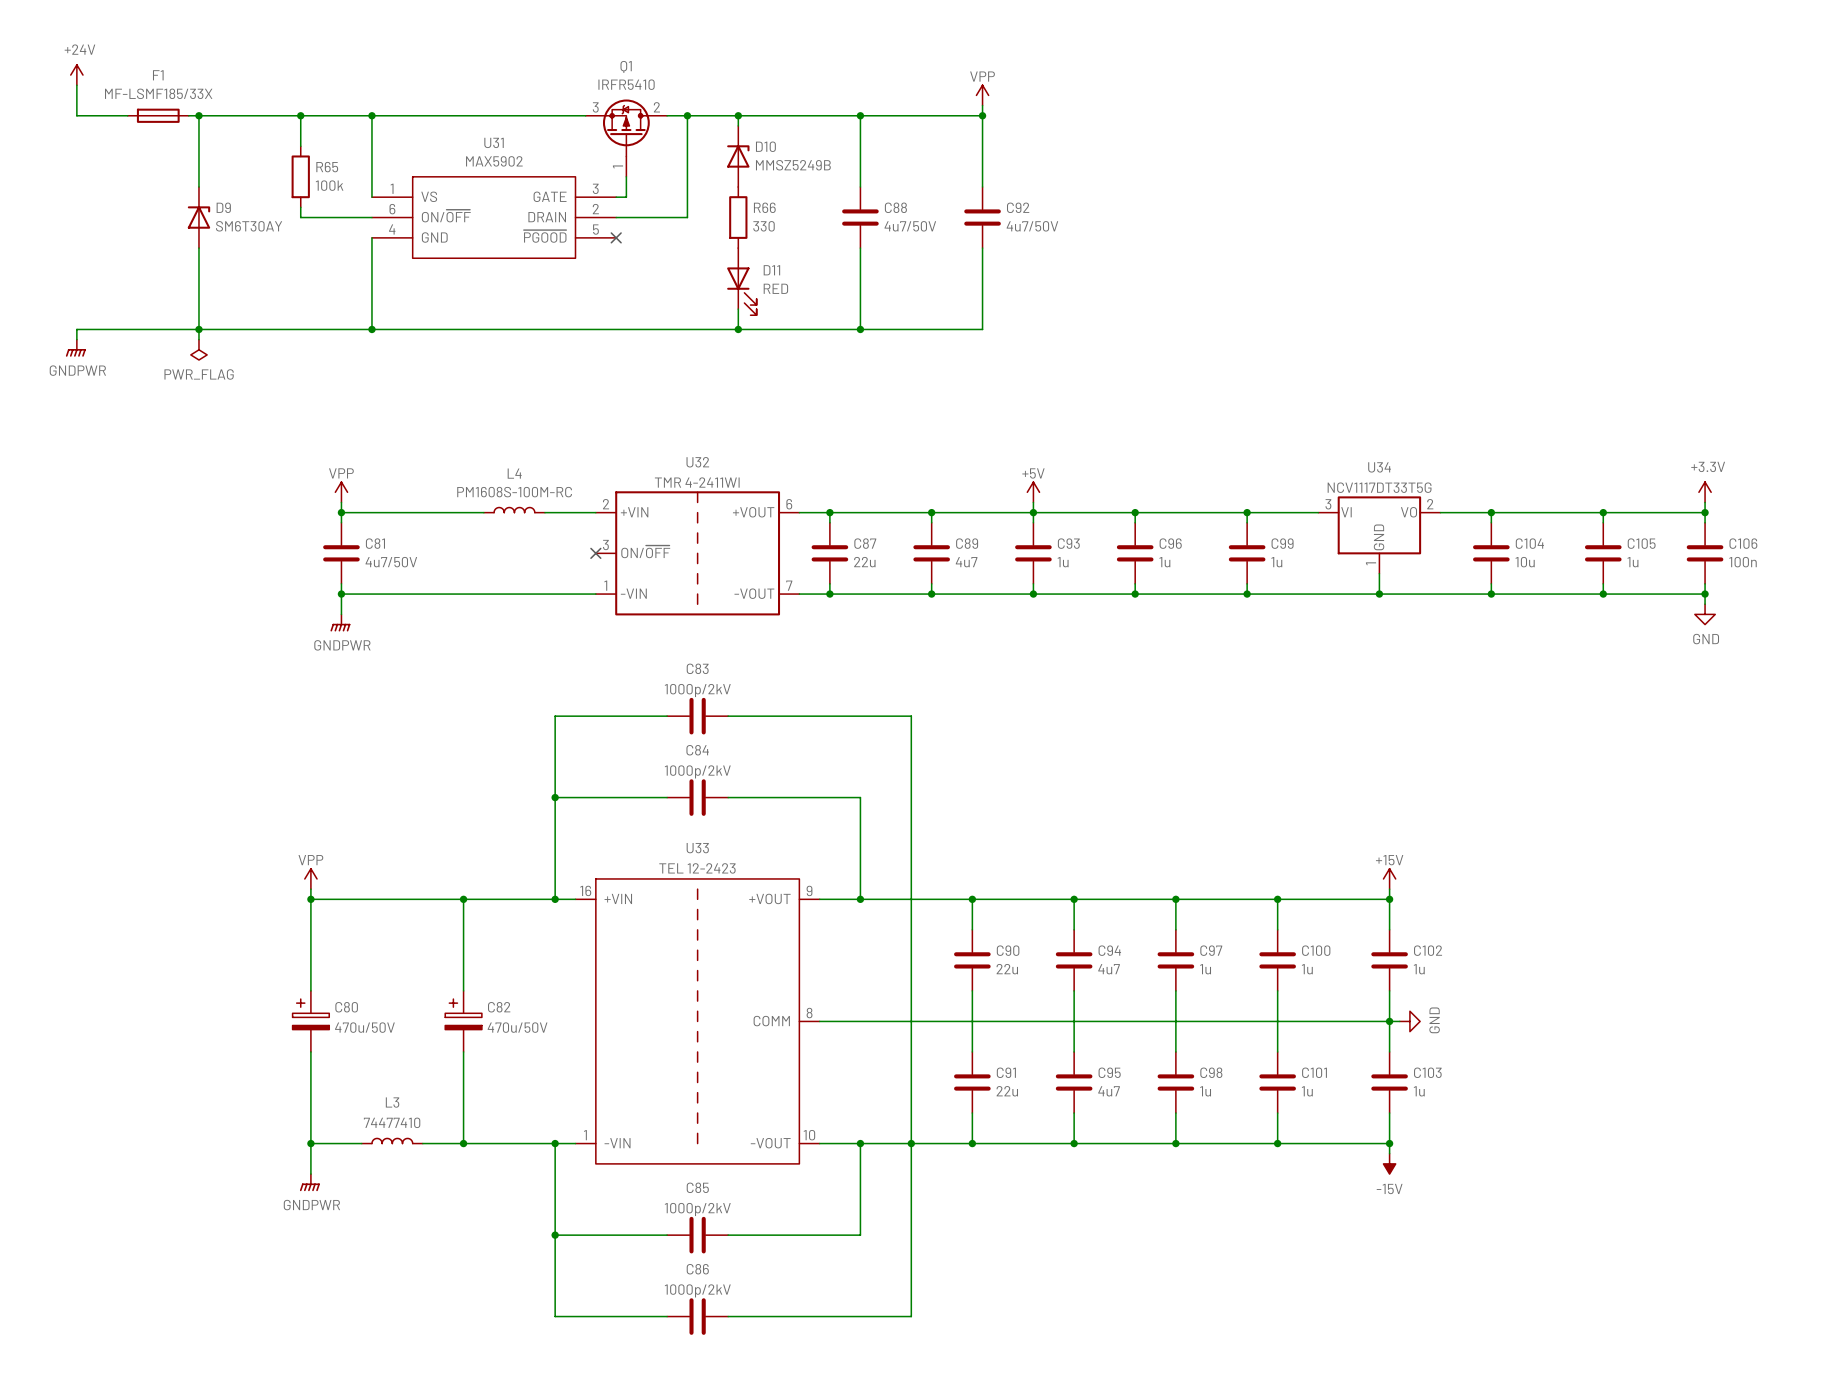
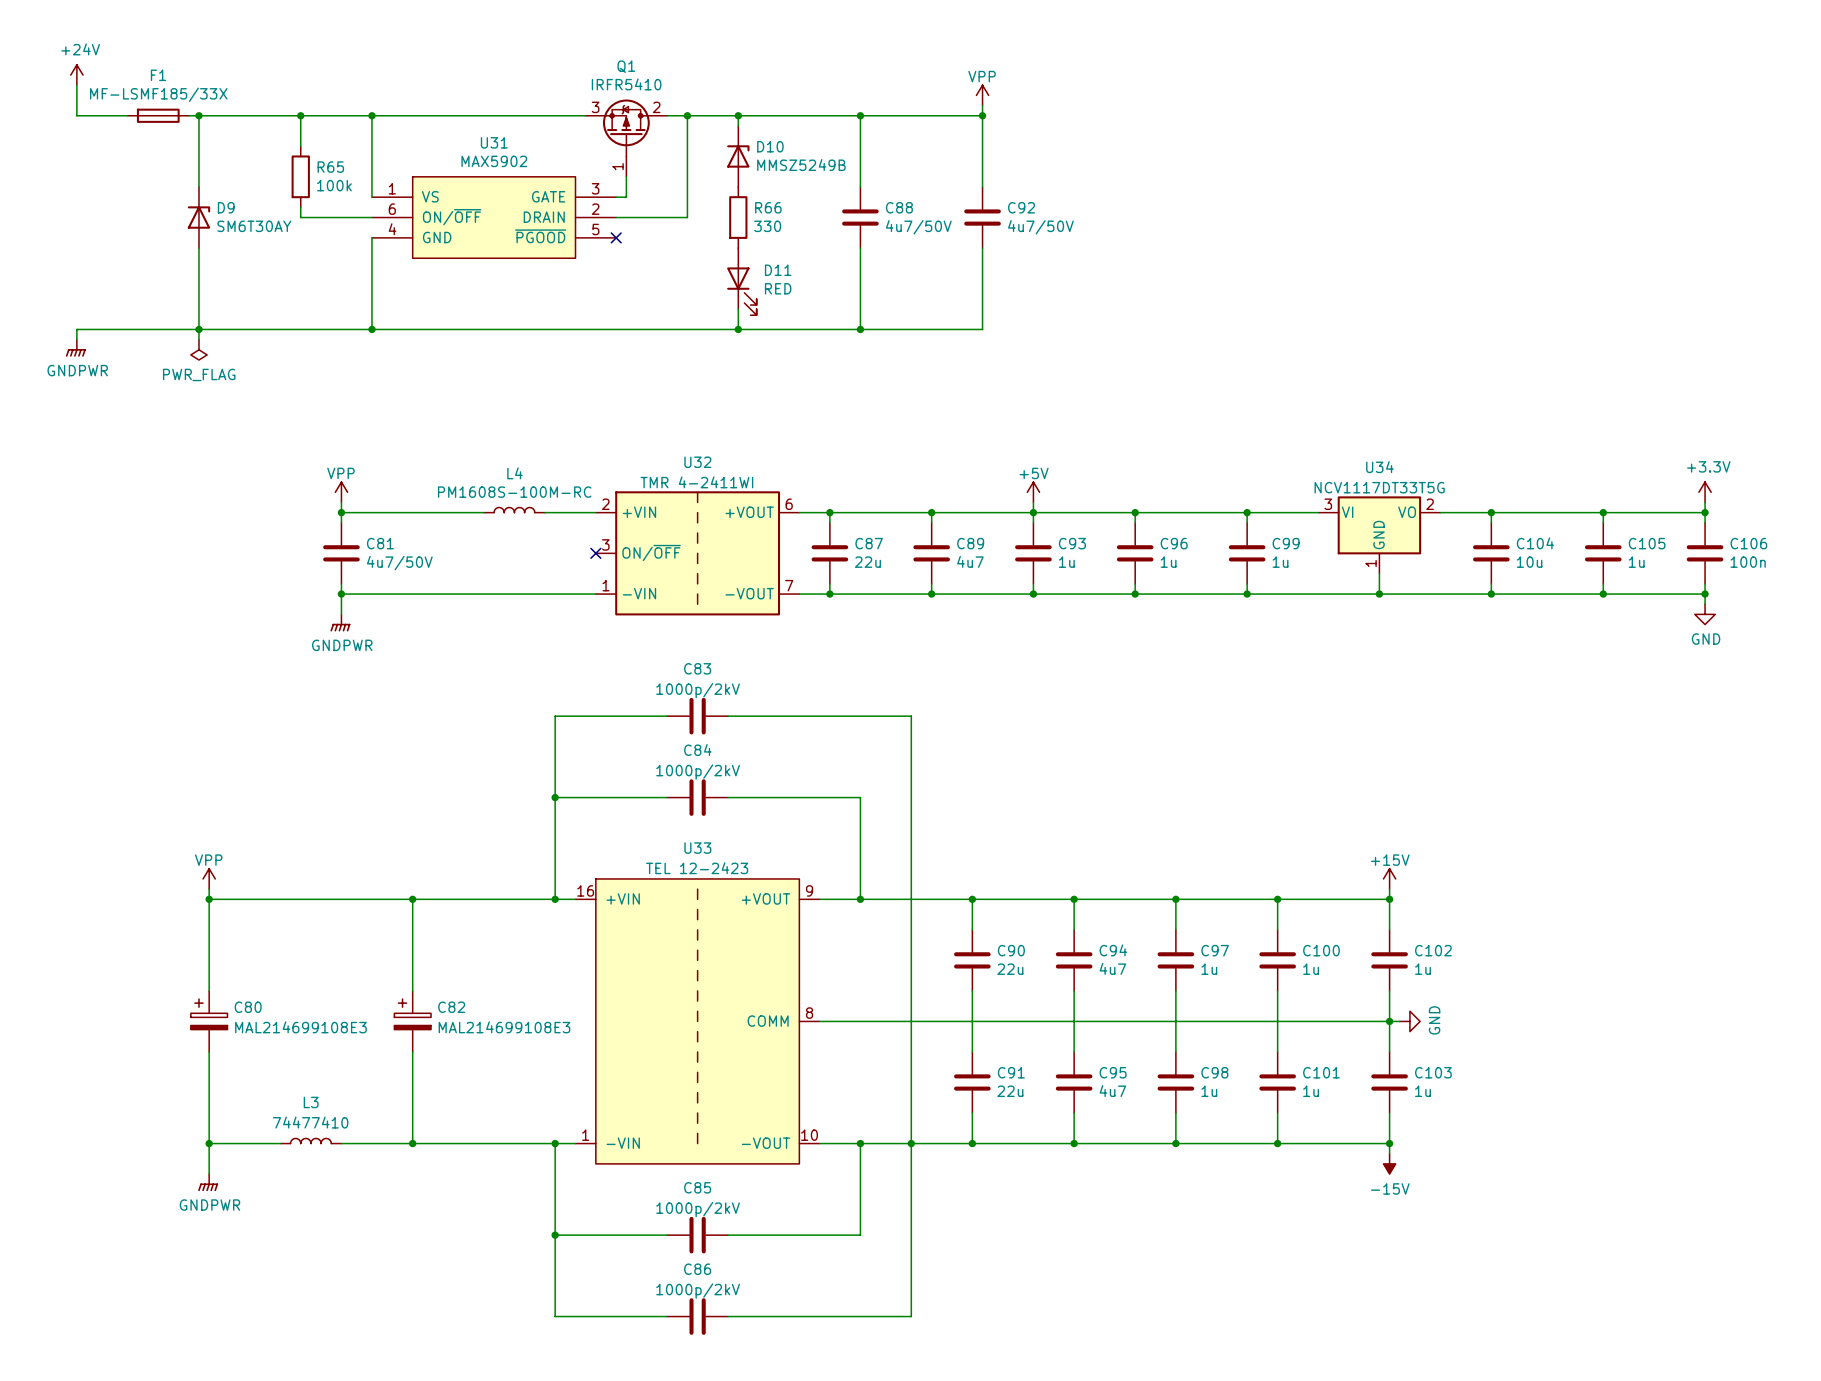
power symbol position: VPP (310, 878) -> VPP (209, 878)
wire: (310, 889) (310, 990) -> (209, 889) (209, 990)
wire: none -> (209, 899) (310, 899)
junction: none -> (209, 899)
junction: (310, 899) -> none
junction: none -> (412, 899)
wire: (463, 899) (463, 990) -> (412, 899) (412, 990)
junction: (463, 899) -> none
C80 position: (310, 1021) -> (209, 1021)
C82 position: (463, 1021) -> (412, 1021)
C80 value: 470u/50V (364, 1027) -> MAL214699108E3 (300, 1027)
C82 value: 470u/50V (517, 1027) -> MAL214699108E3 (504, 1027)
wire: (310, 1051) (310, 1174) -> (209, 1051) (209, 1174)
wire: (463, 1051) (463, 1143) -> (412, 1051) (412, 1143)
L3 position: (392, 1141) -> (310, 1141)
wire: none -> (209, 1143) (280, 1143)
junction: none -> (209, 1143)
wire: (310, 1143) (341, 1143) -> none
junction: (310, 1143) -> none
wire: none -> (361, 1143) (422, 1143)
junction: none -> (412, 1143)
junction: (463, 1143) -> none
power symbol position: GNDPWR (309, 1182) -> GNDPWR (208, 1182)

